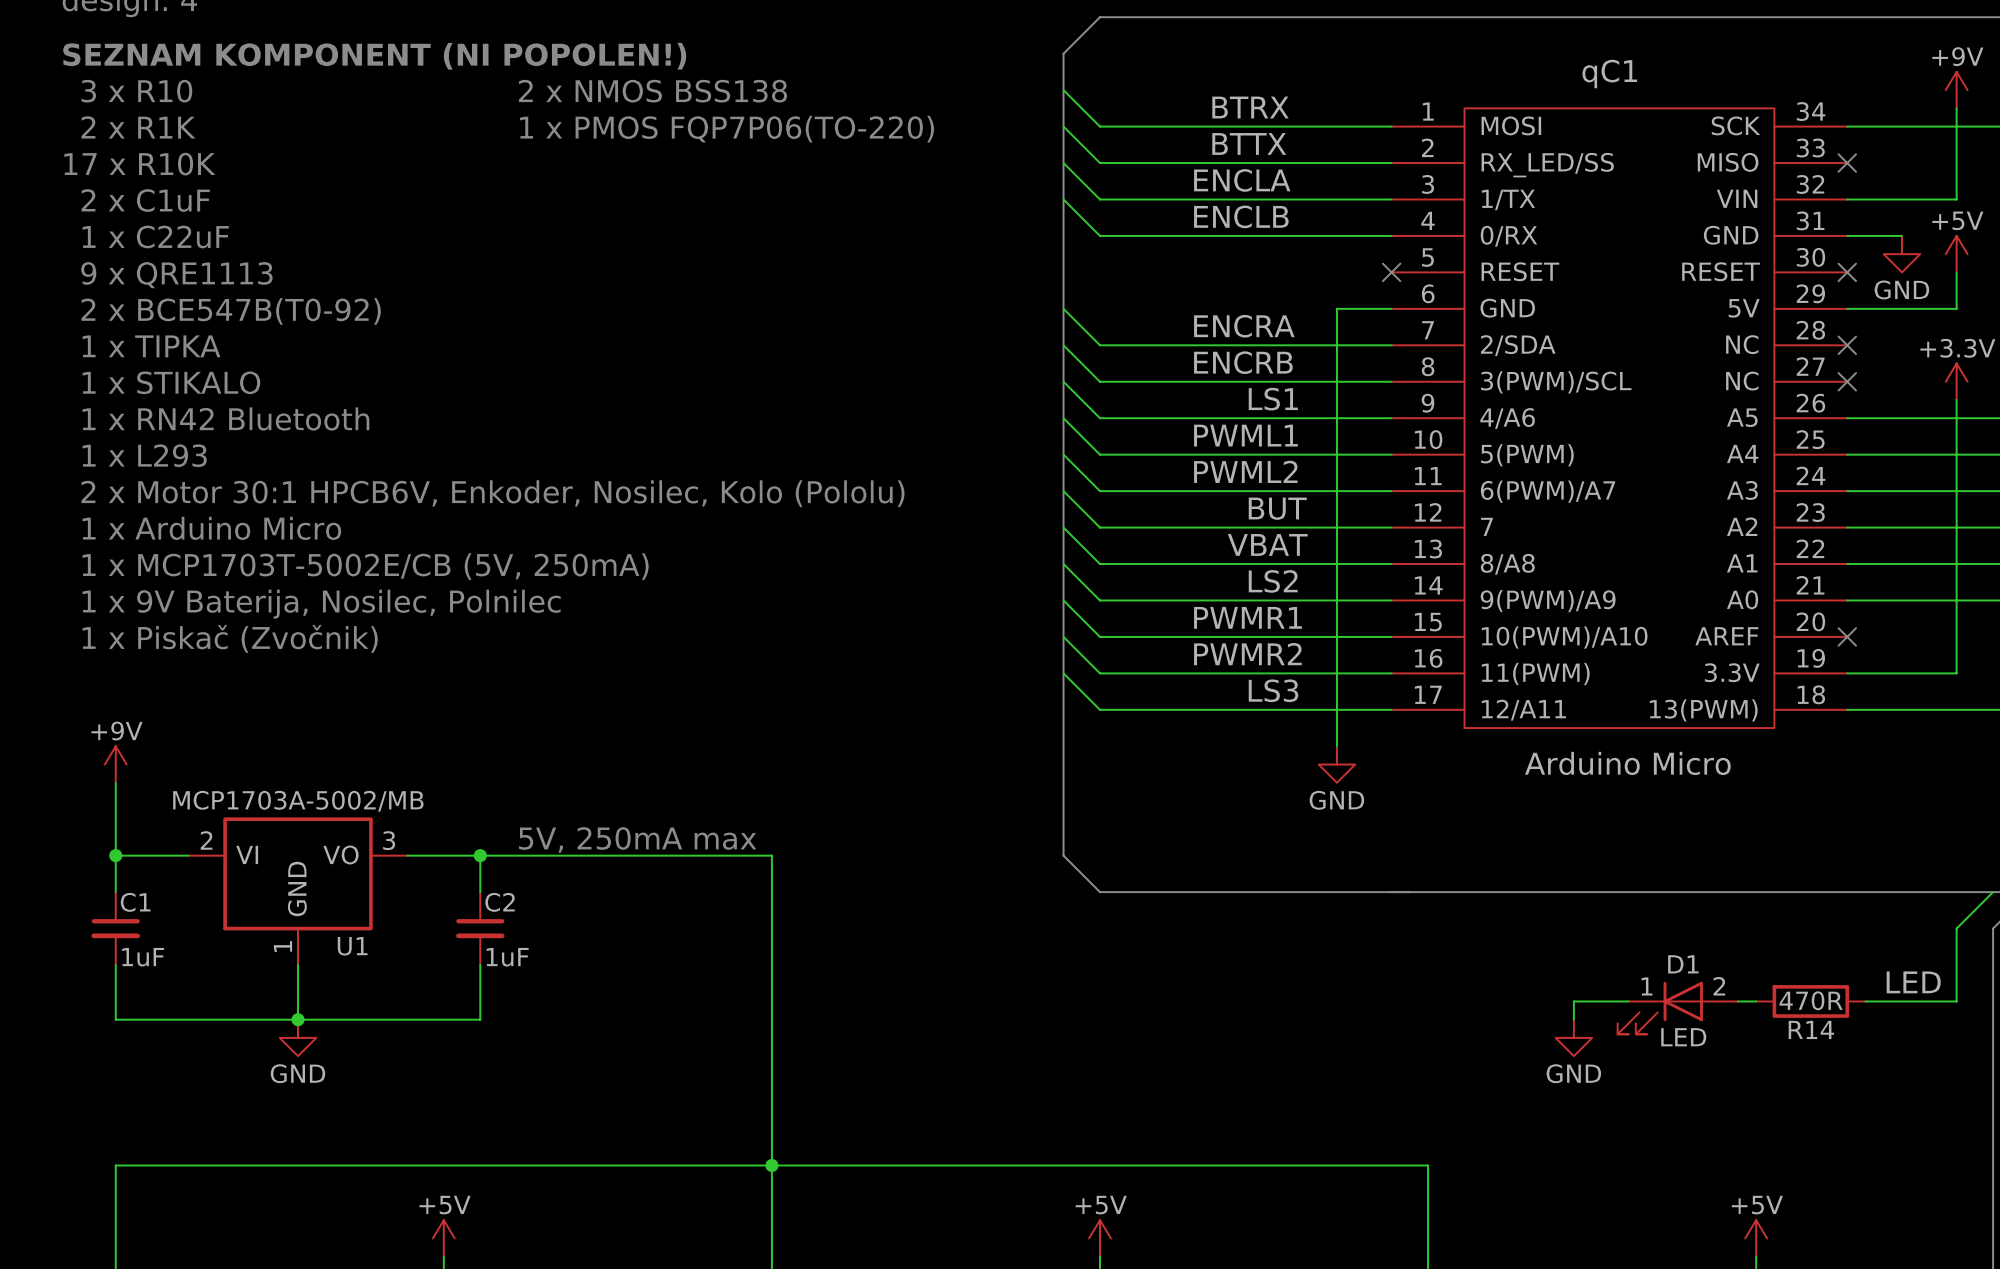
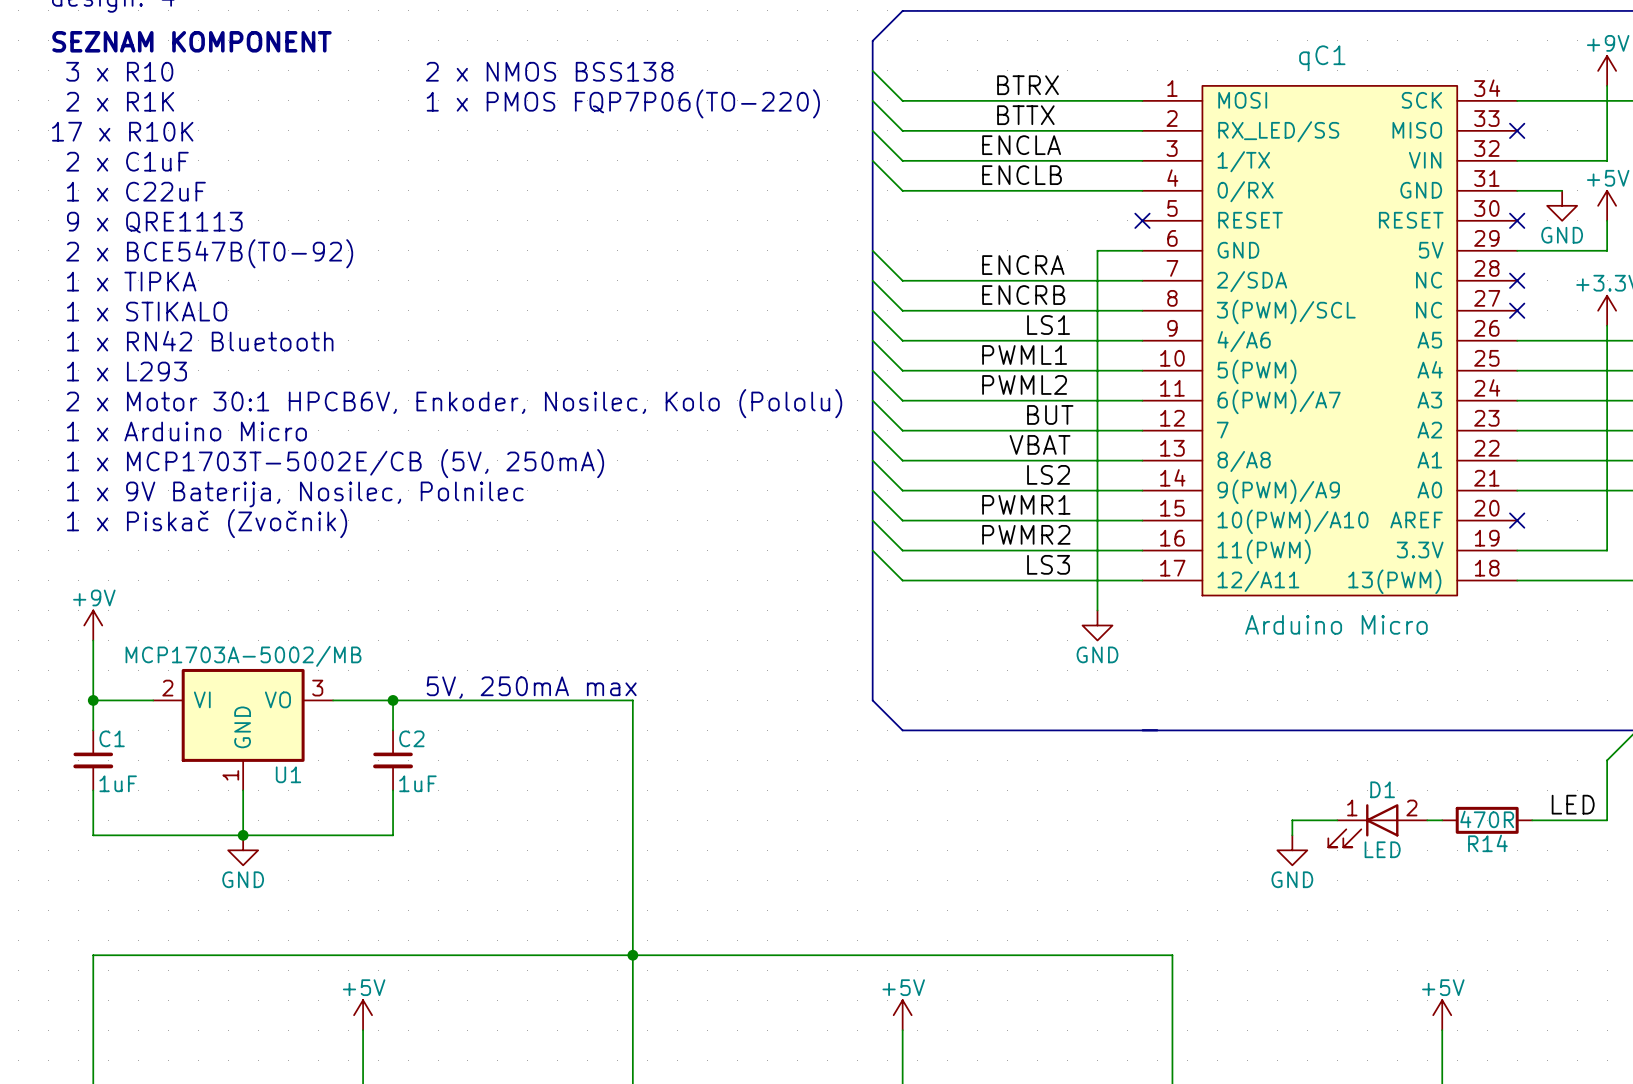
text: SEZNAM KOMPONENT (NI POPOLEN!) (374, 56) -> SEZNAM KOMPONENT (191, 41)

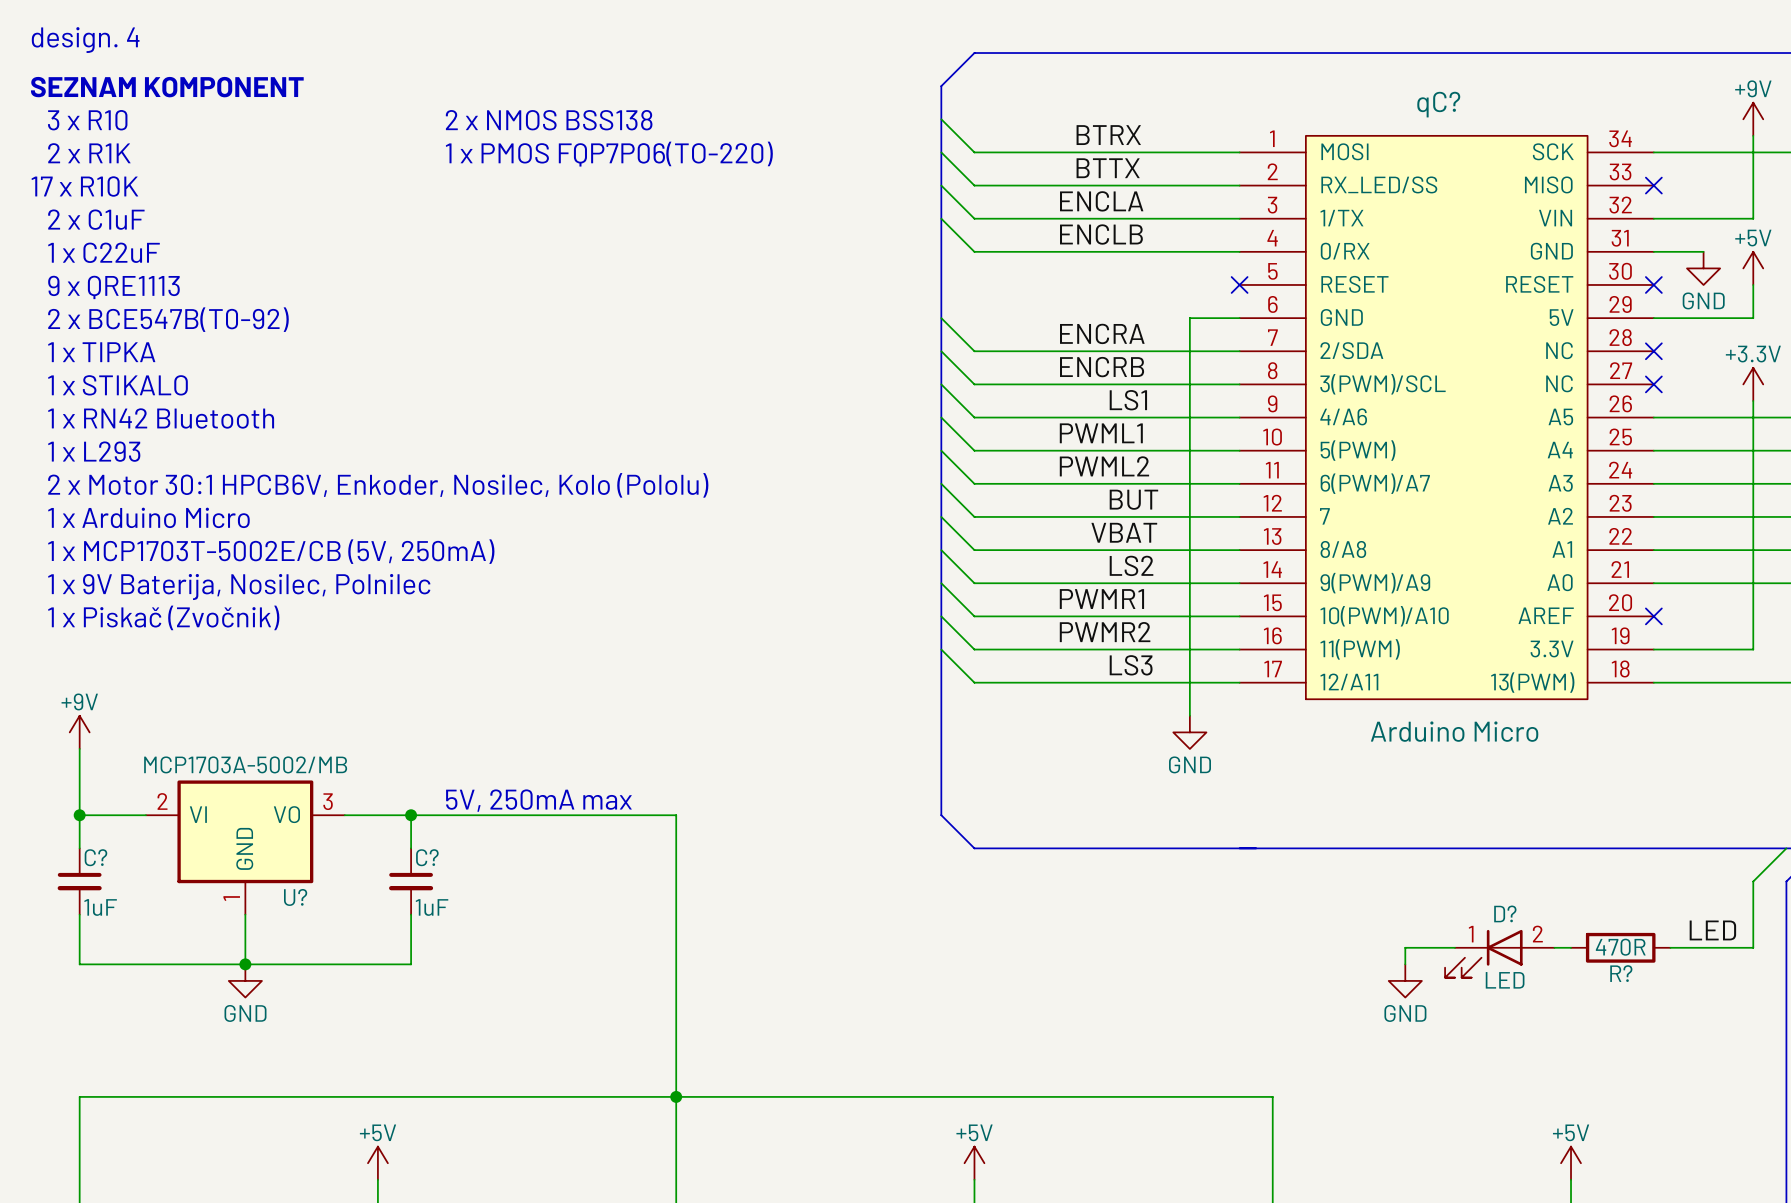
qC1 name: qC1 (1322, 58) -> qC? (1438, 104)
C1 name: C1 (112, 738) -> C? (95, 857)
C2 name: C2 (411, 738) -> C? (427, 857)
U1 name: U1 (288, 774) -> U? (295, 897)
D1 name: D1 (1382, 789) -> D? (1505, 913)
R14 name: R14 (1487, 843) -> R? (1621, 973)

